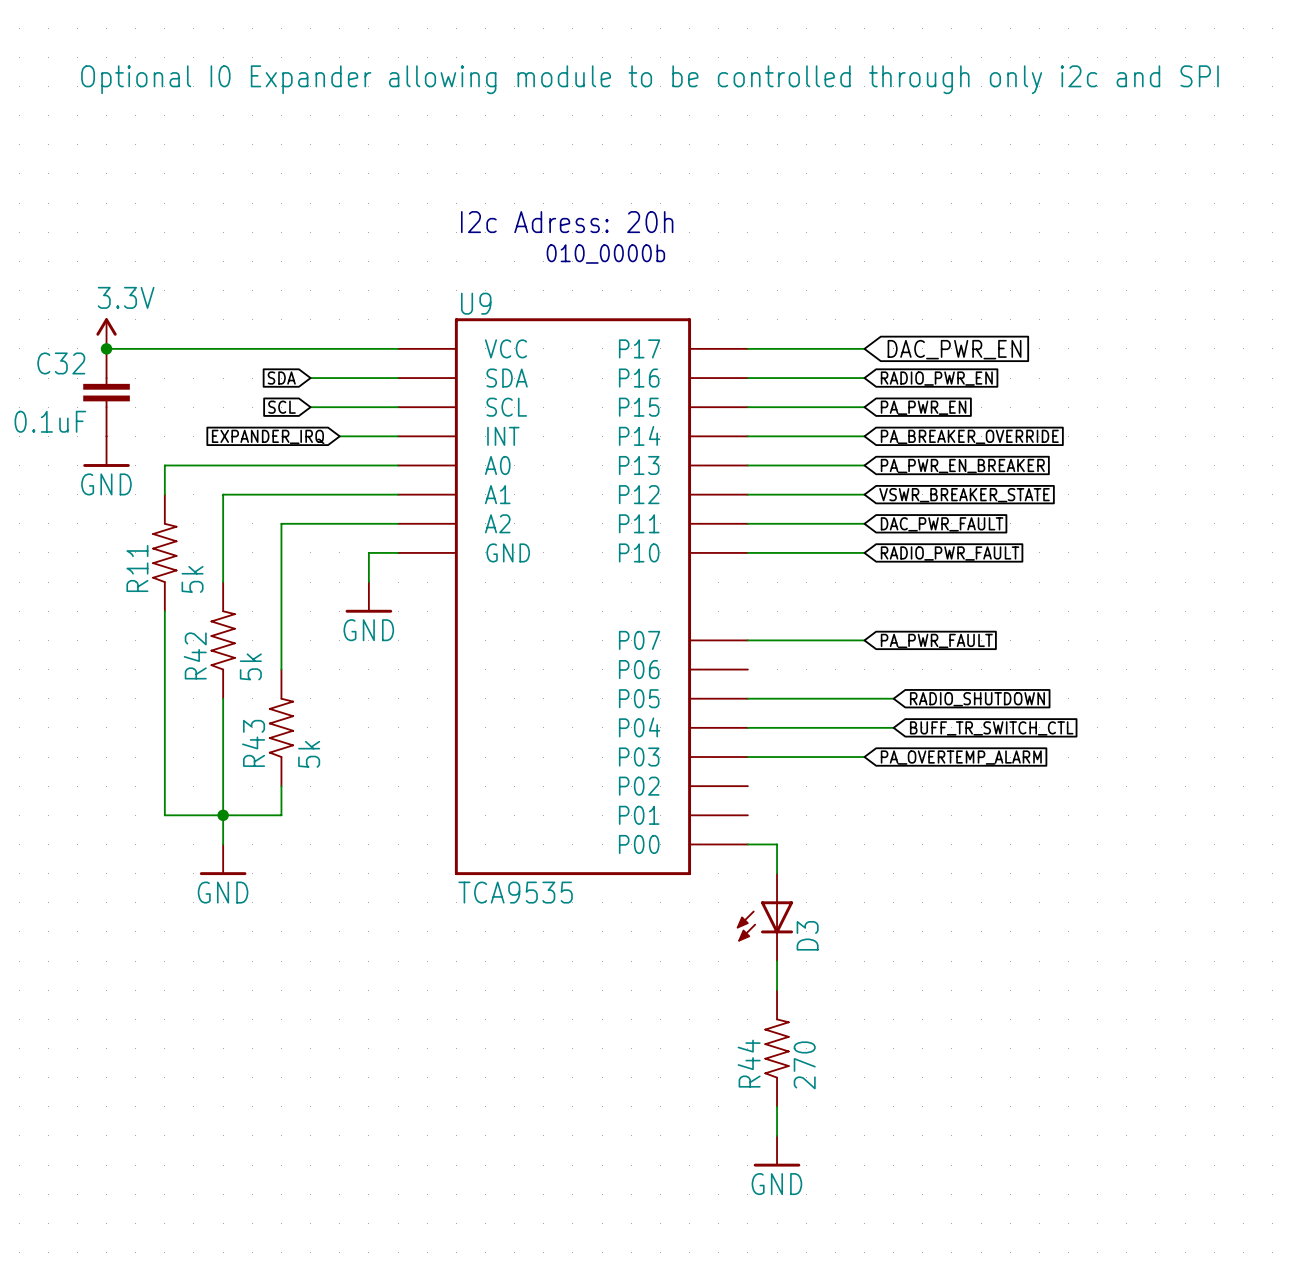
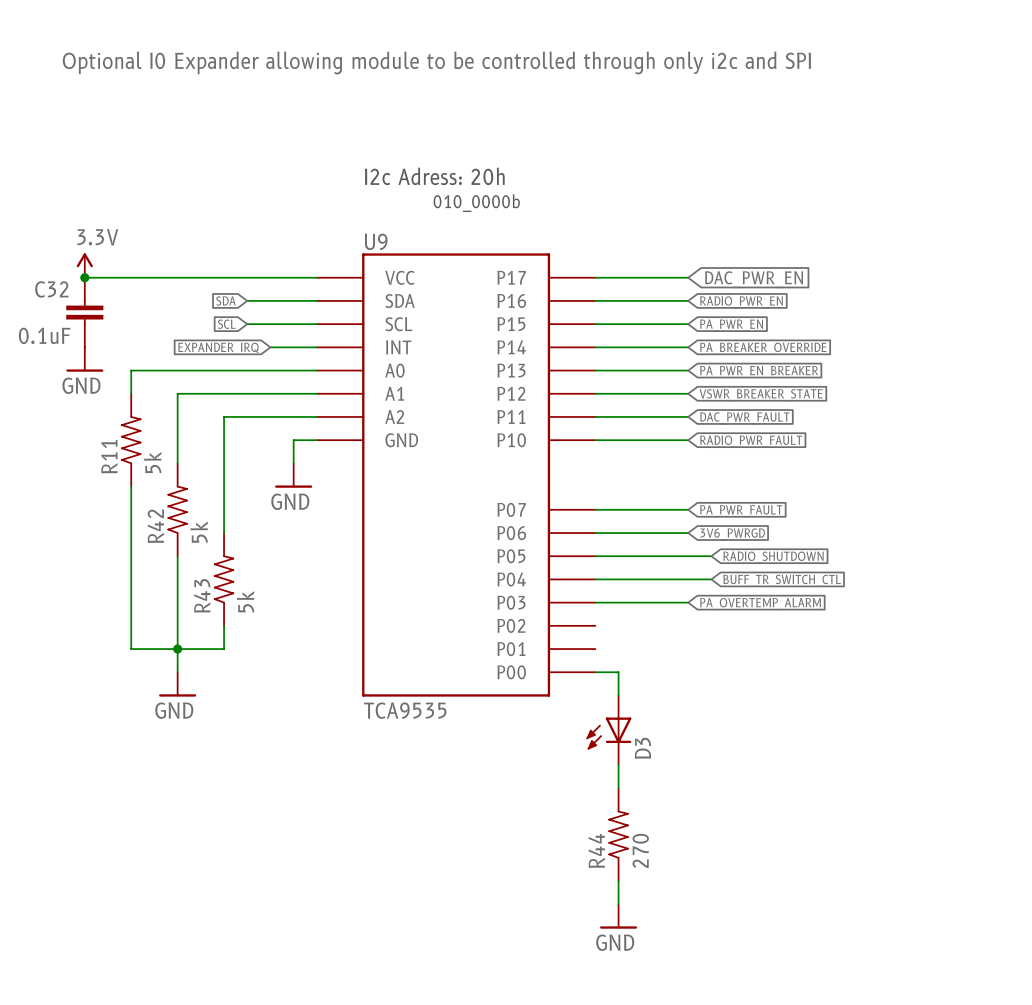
wire: none -> (595, 533) (688, 533)
global label: none -> 3V6_PWRGD (732, 534)

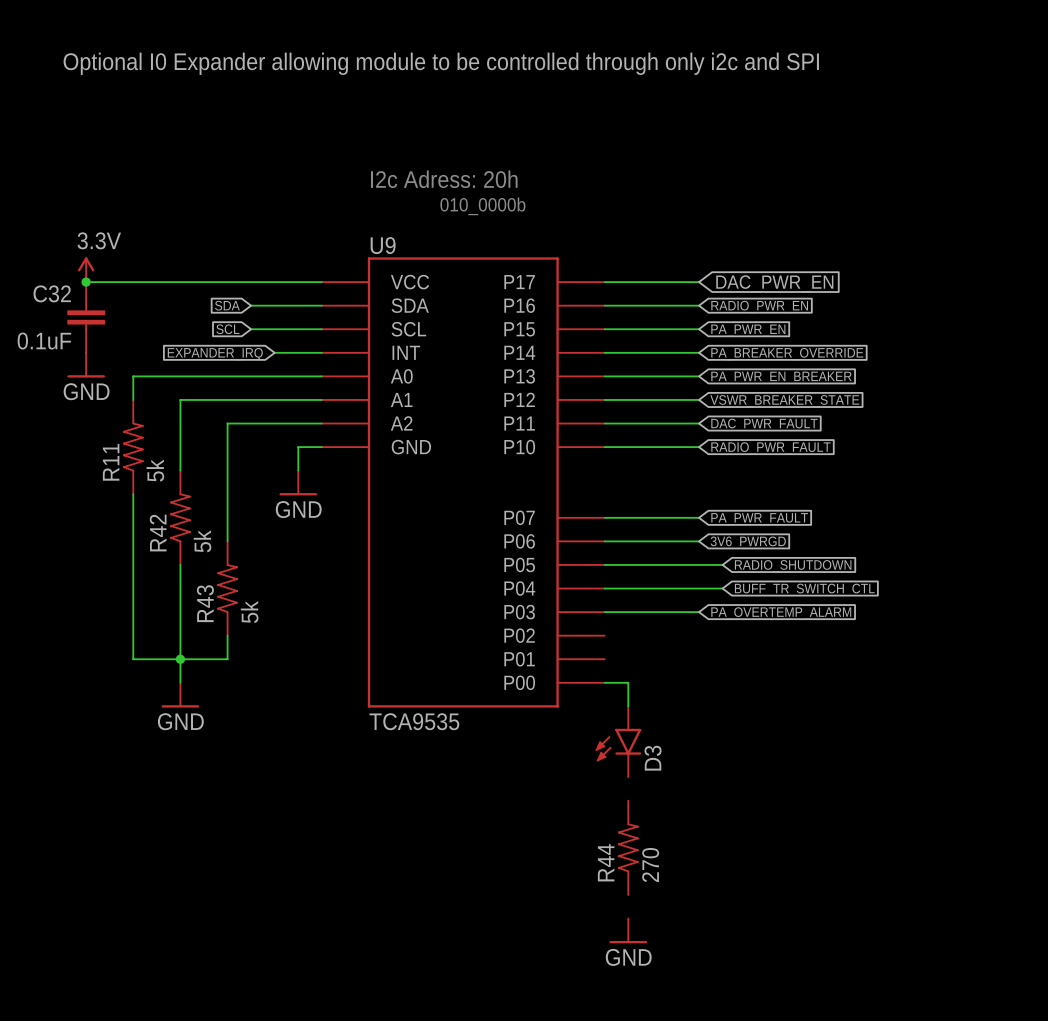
D3 symbol: [586, 695, 632, 766] -> [595, 706, 642, 778]
wire: (618, 765) (618, 788) -> none
wire: (618, 881) (618, 904) -> none

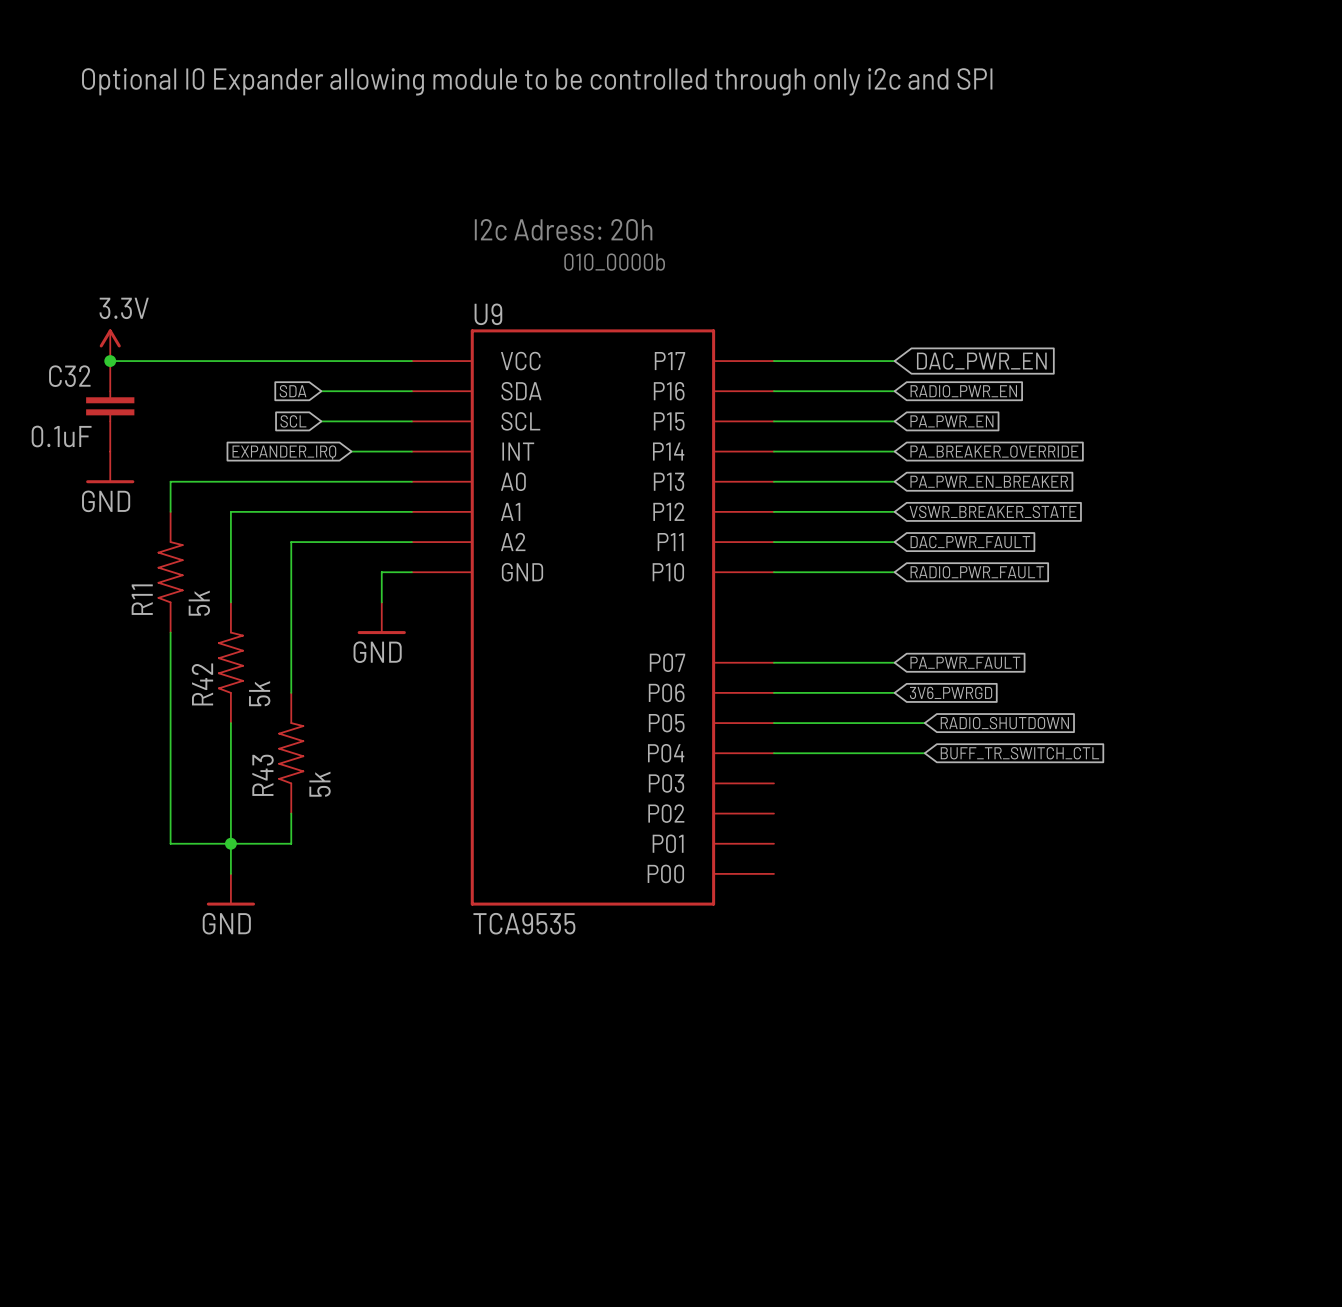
wire: (604, 612) (699, 612) -> none
global label: PA_OVERTEMP_ALARM (781, 613) -> none
wire: (604, 682) (628, 682) (628, 706) -> none
D3: (618, 741) -> none
R44: 270 (628, 847) -> none
power symbol: GND (628, 930) -> none

